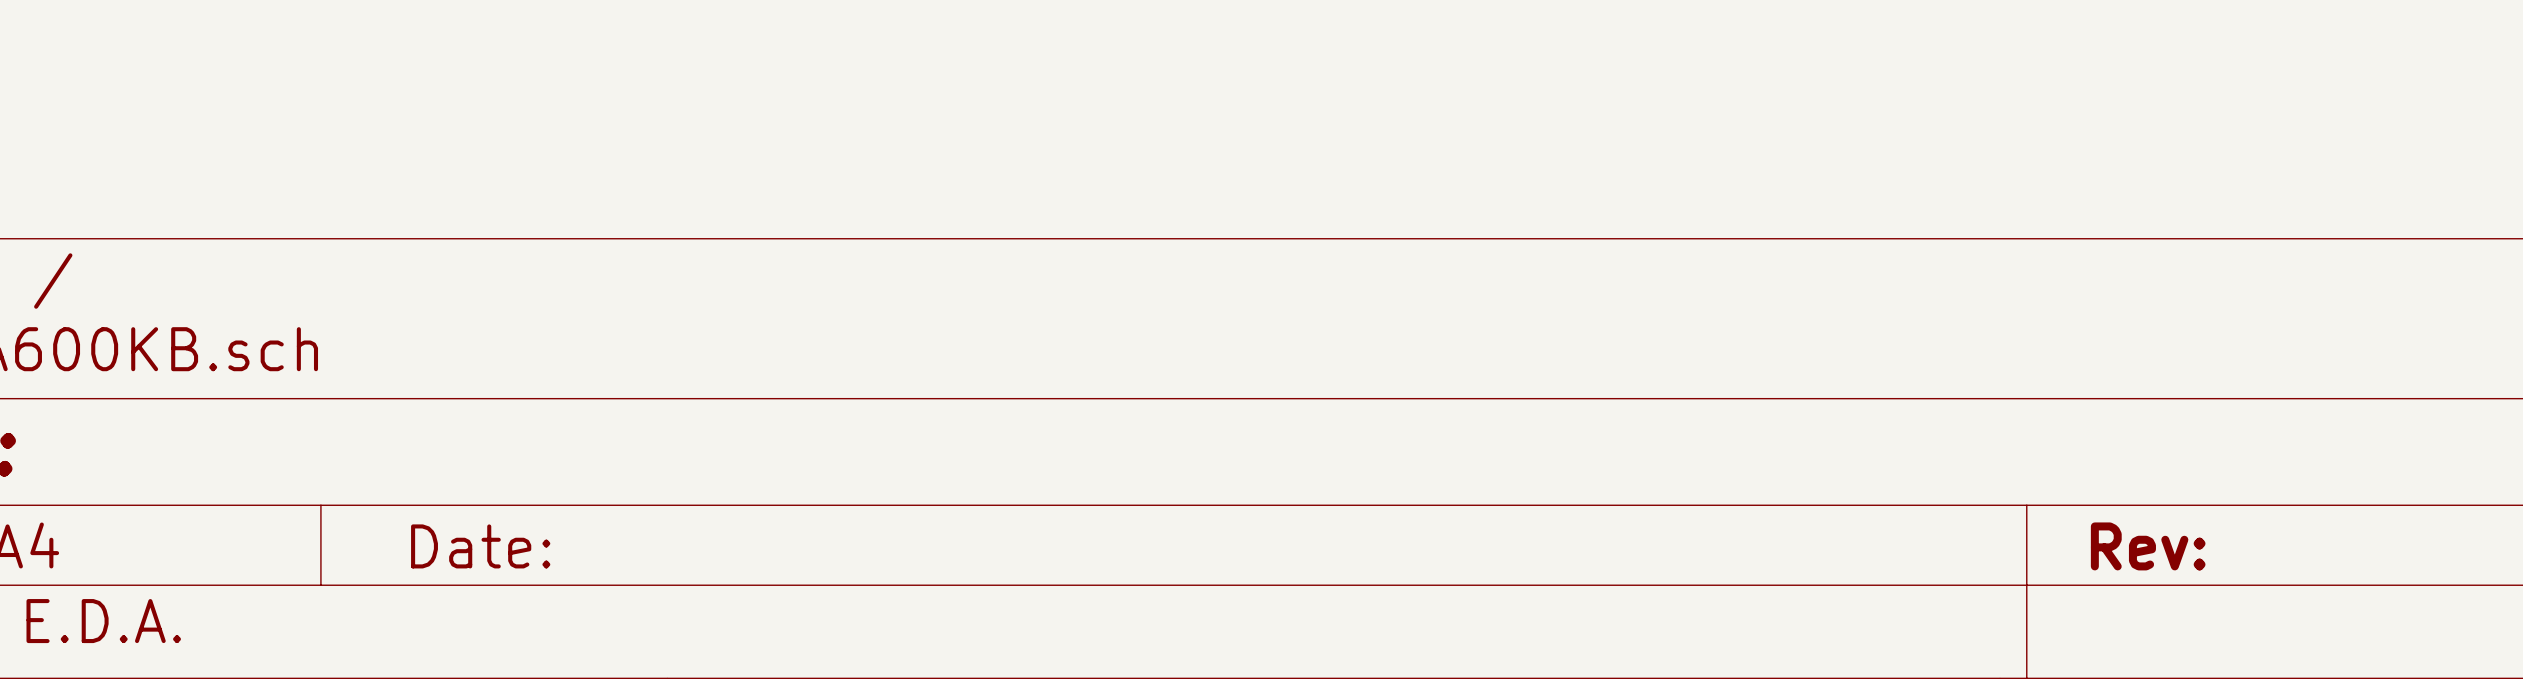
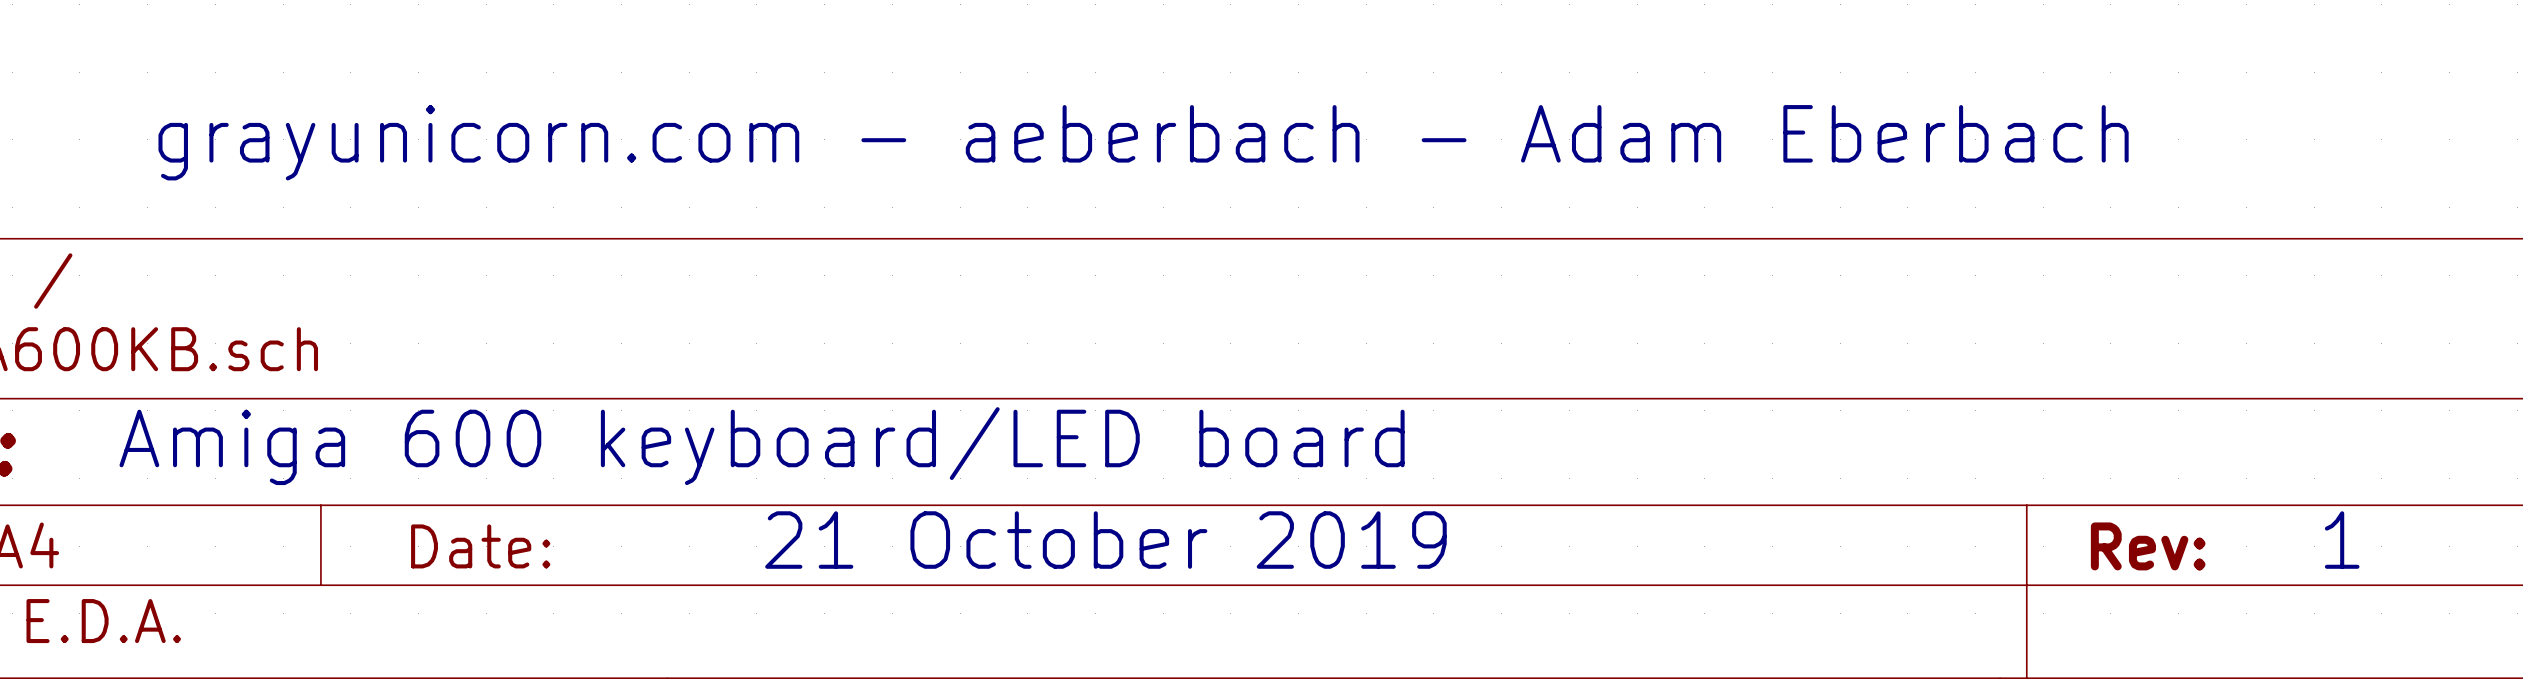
text: none -> grayunicorn.com - aeberbach - Adam Eberbach (1143, 142)
text: none -> Amiga 600 keyboard/LED board (762, 446)
text: none -> 21 October 2019 (1105, 540)
text: none -> 1 (2342, 540)

